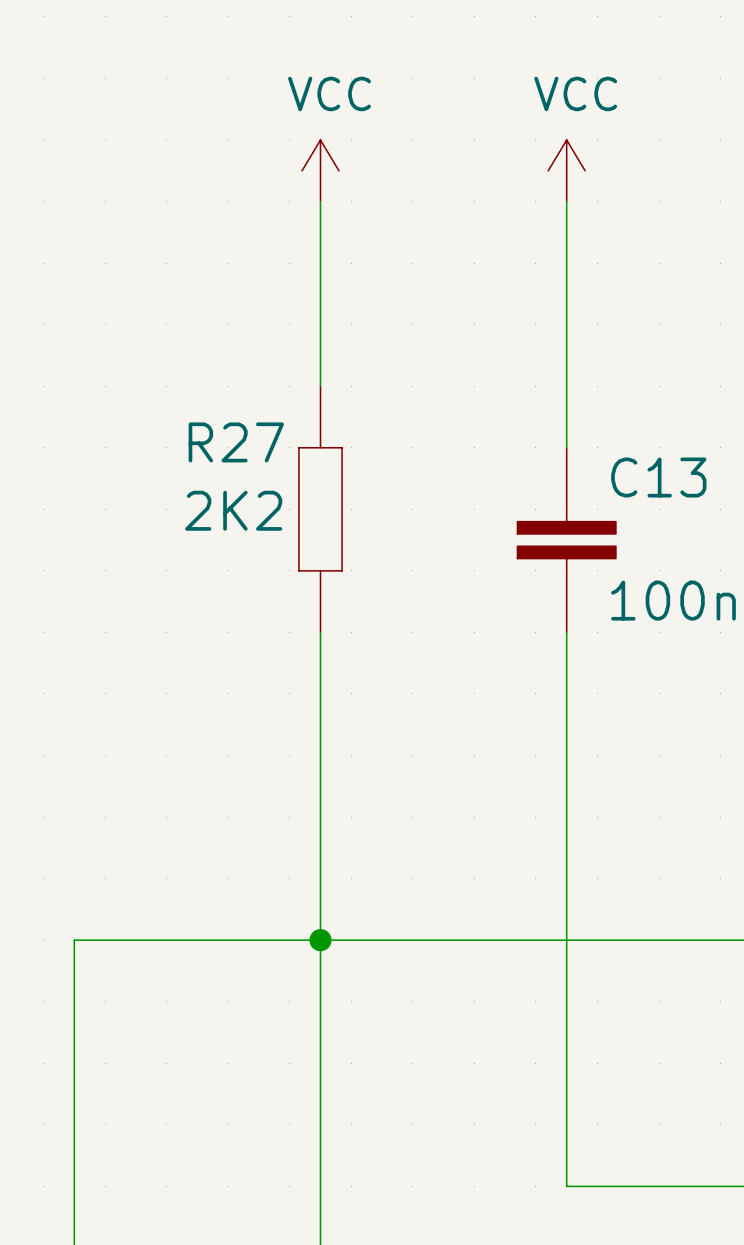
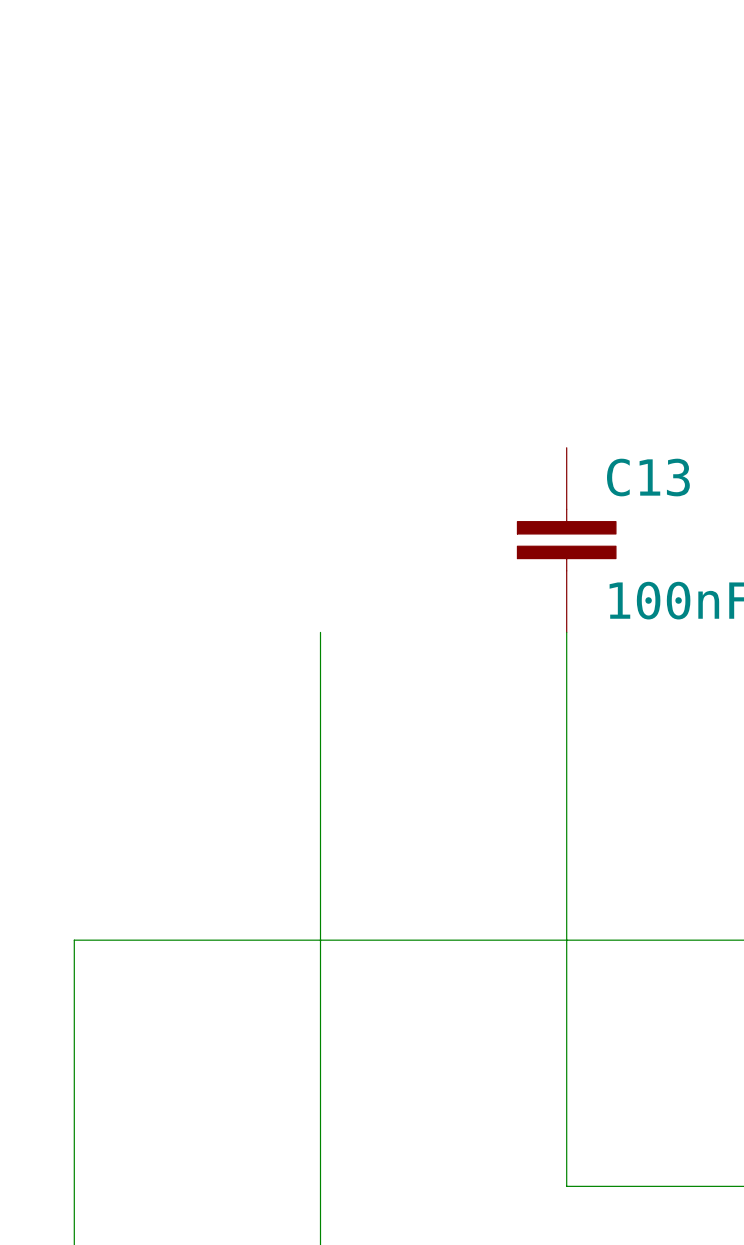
power symbol: VCC (320, 170) -> none
power symbol: VCC (566, 170) -> none
wire: (320, 201) (320, 386) -> none
wire: (566, 201) (566, 447) -> none
R27: 2K2 (320, 509) -> none
junction: (320, 940) -> none

